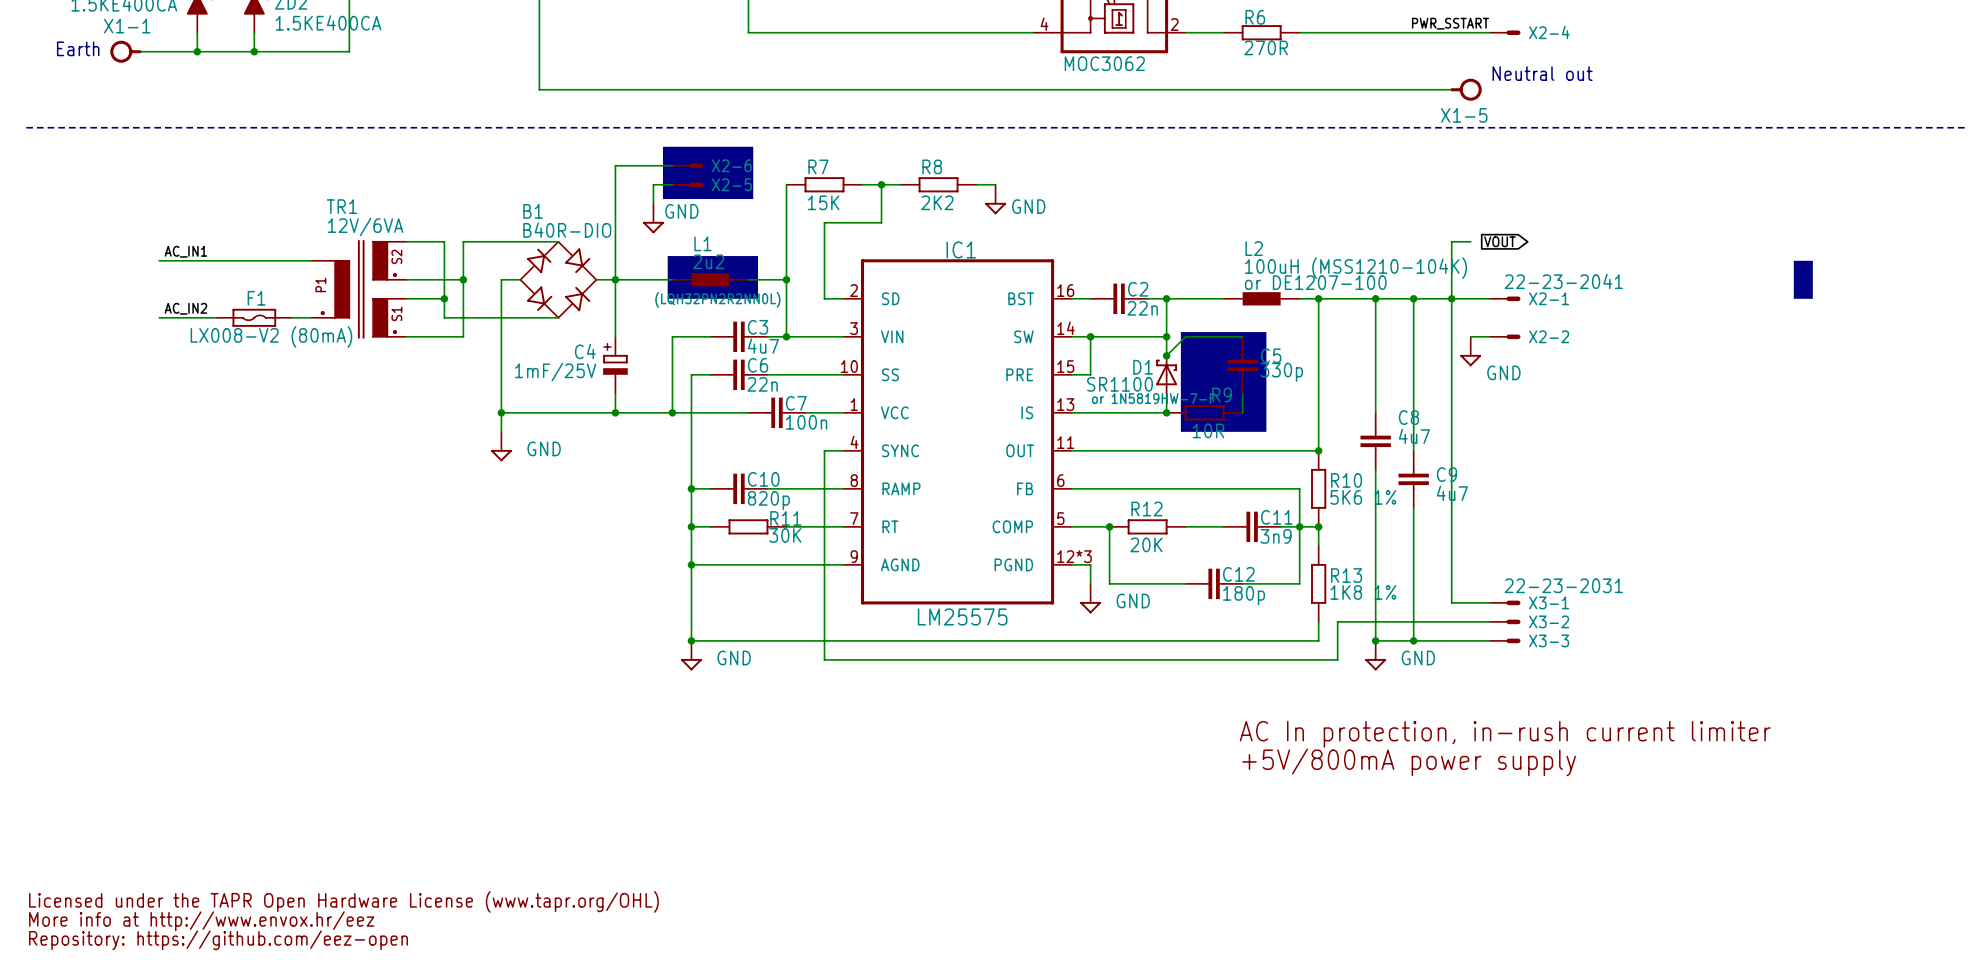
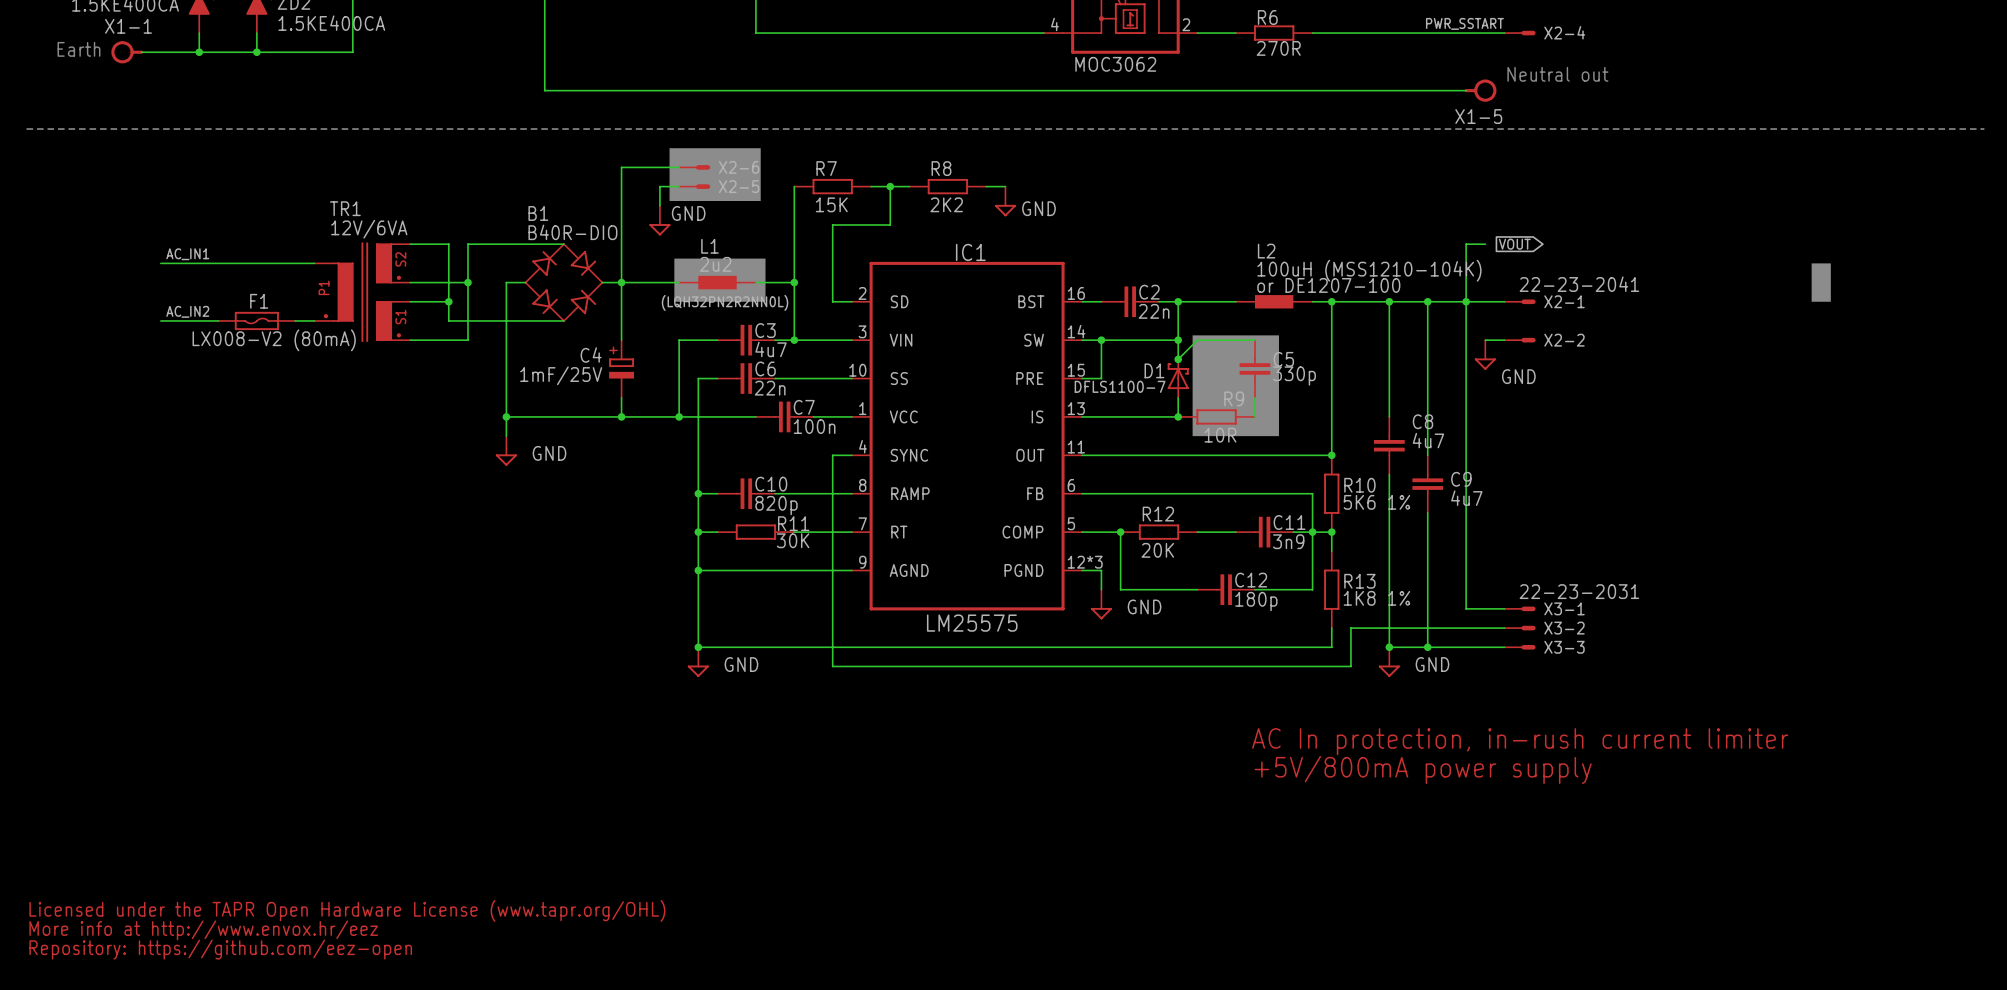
D1 value: SR1100 (1120, 384) -> DFLS1100-7 (1120, 386)
text: or 1N5819HW-7-F (1153, 398) -> none

